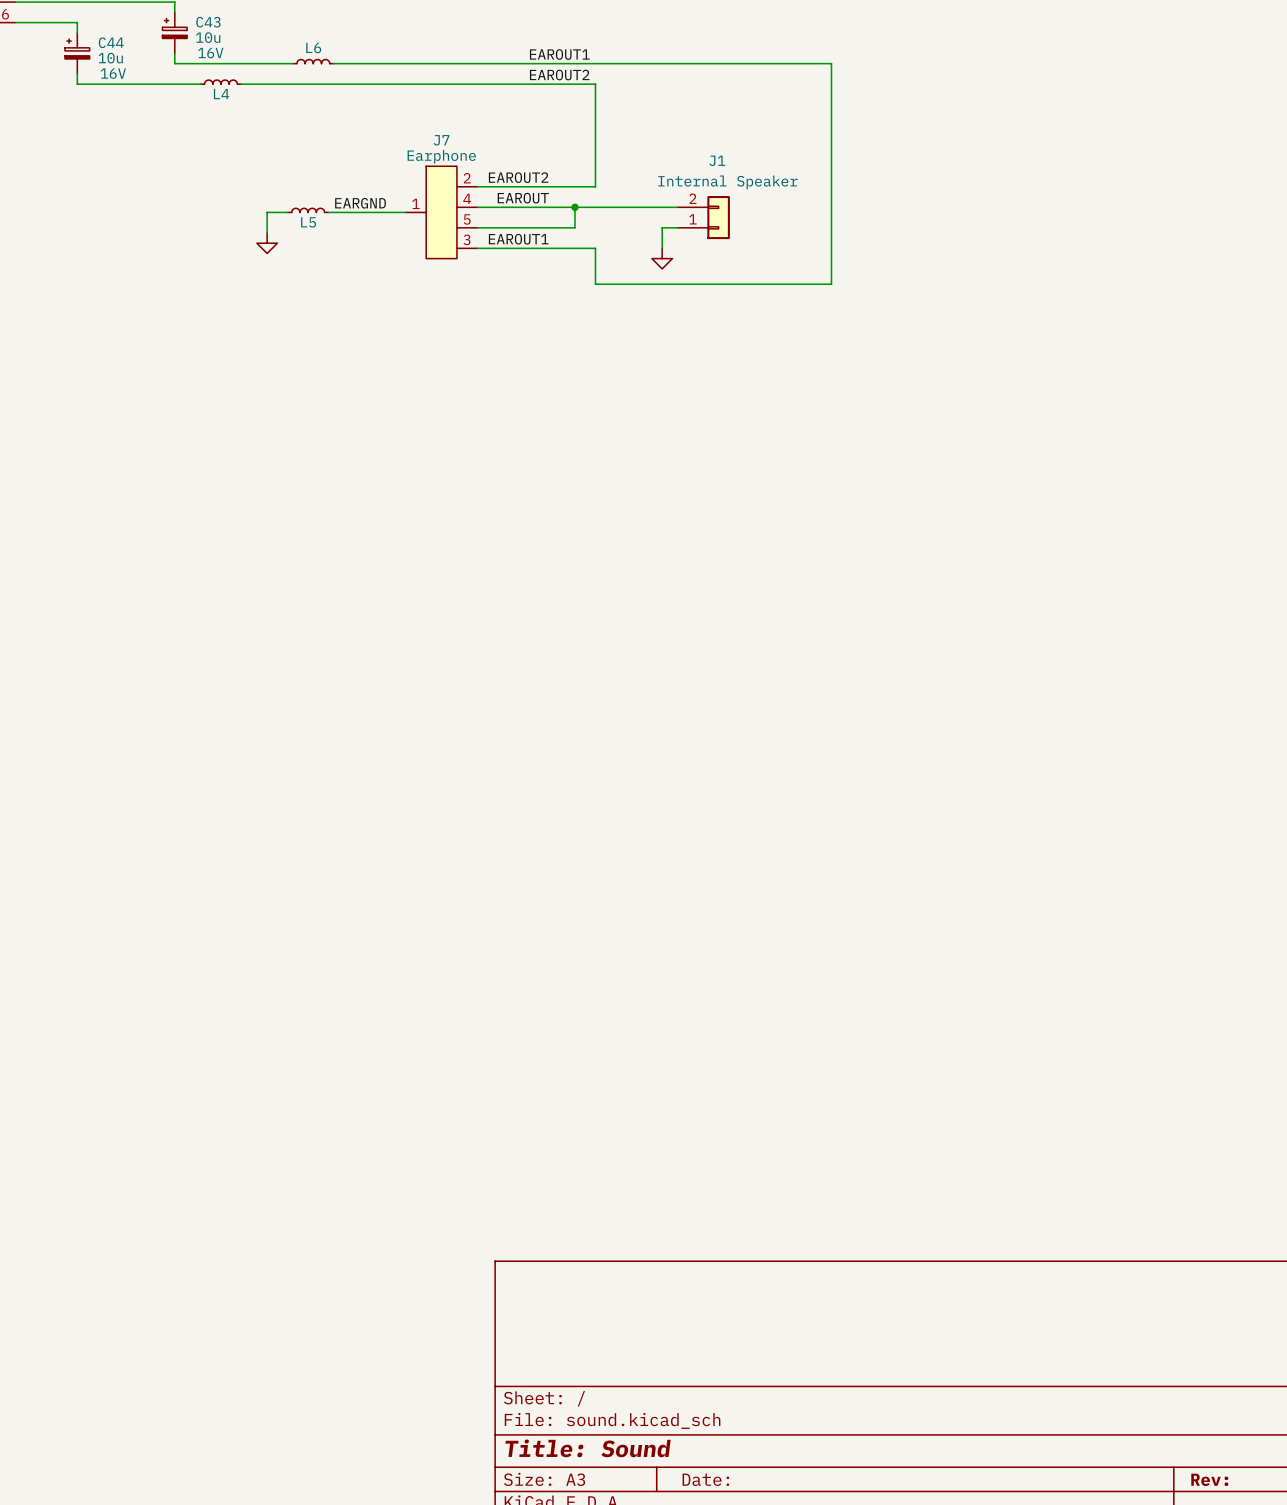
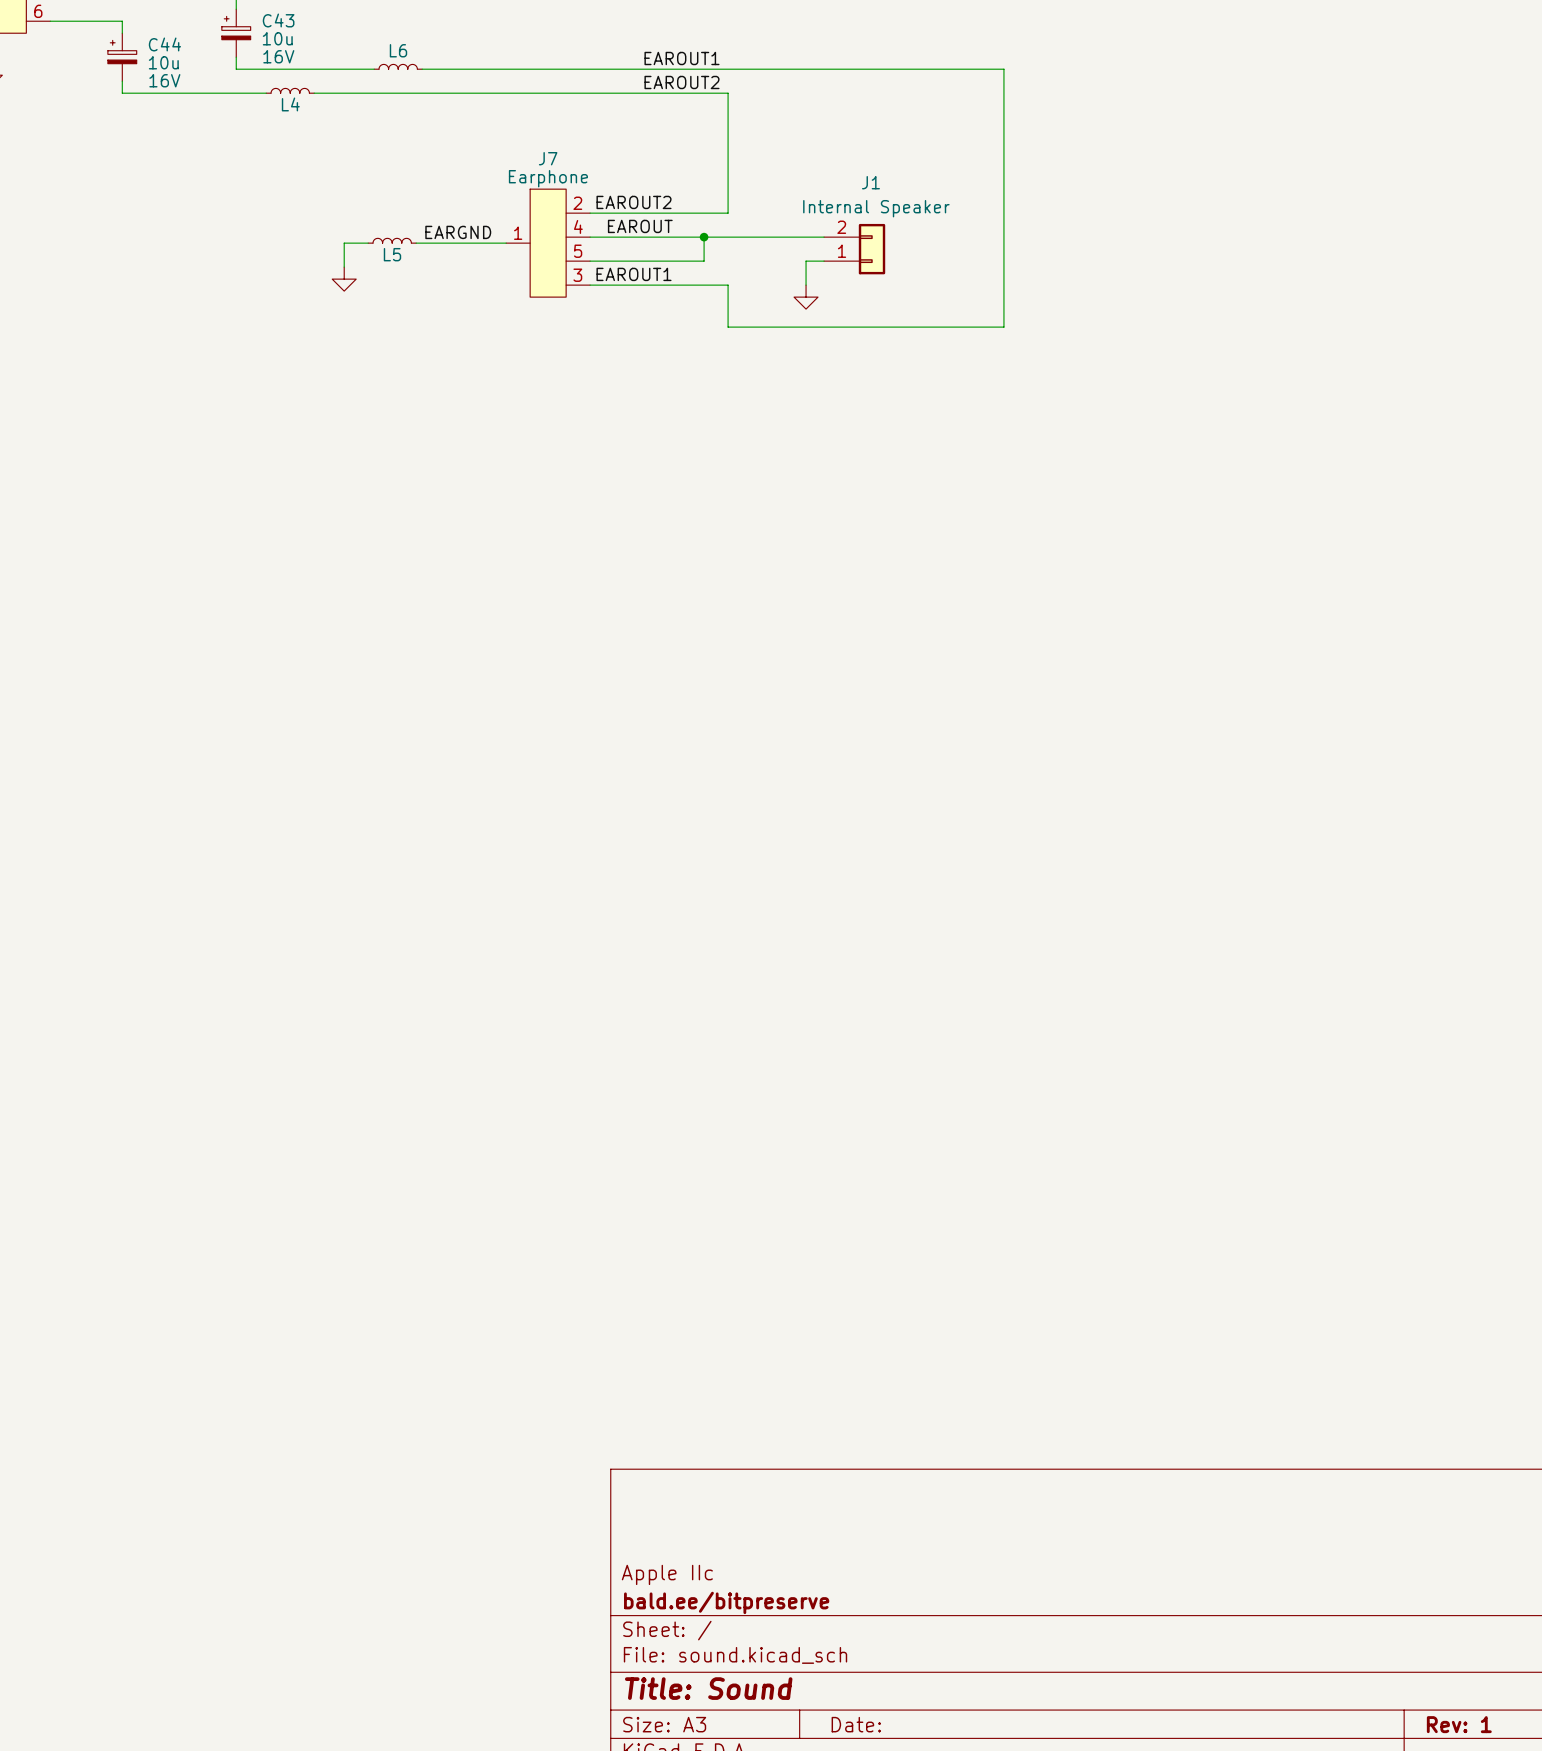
title block: none -> Apple IIc (667, 1574)
title block: none -> bald.ee/bitpreserve (726, 1602)
title block: Rev: (1209, 1479) -> Rev: 1 (1459, 1724)

